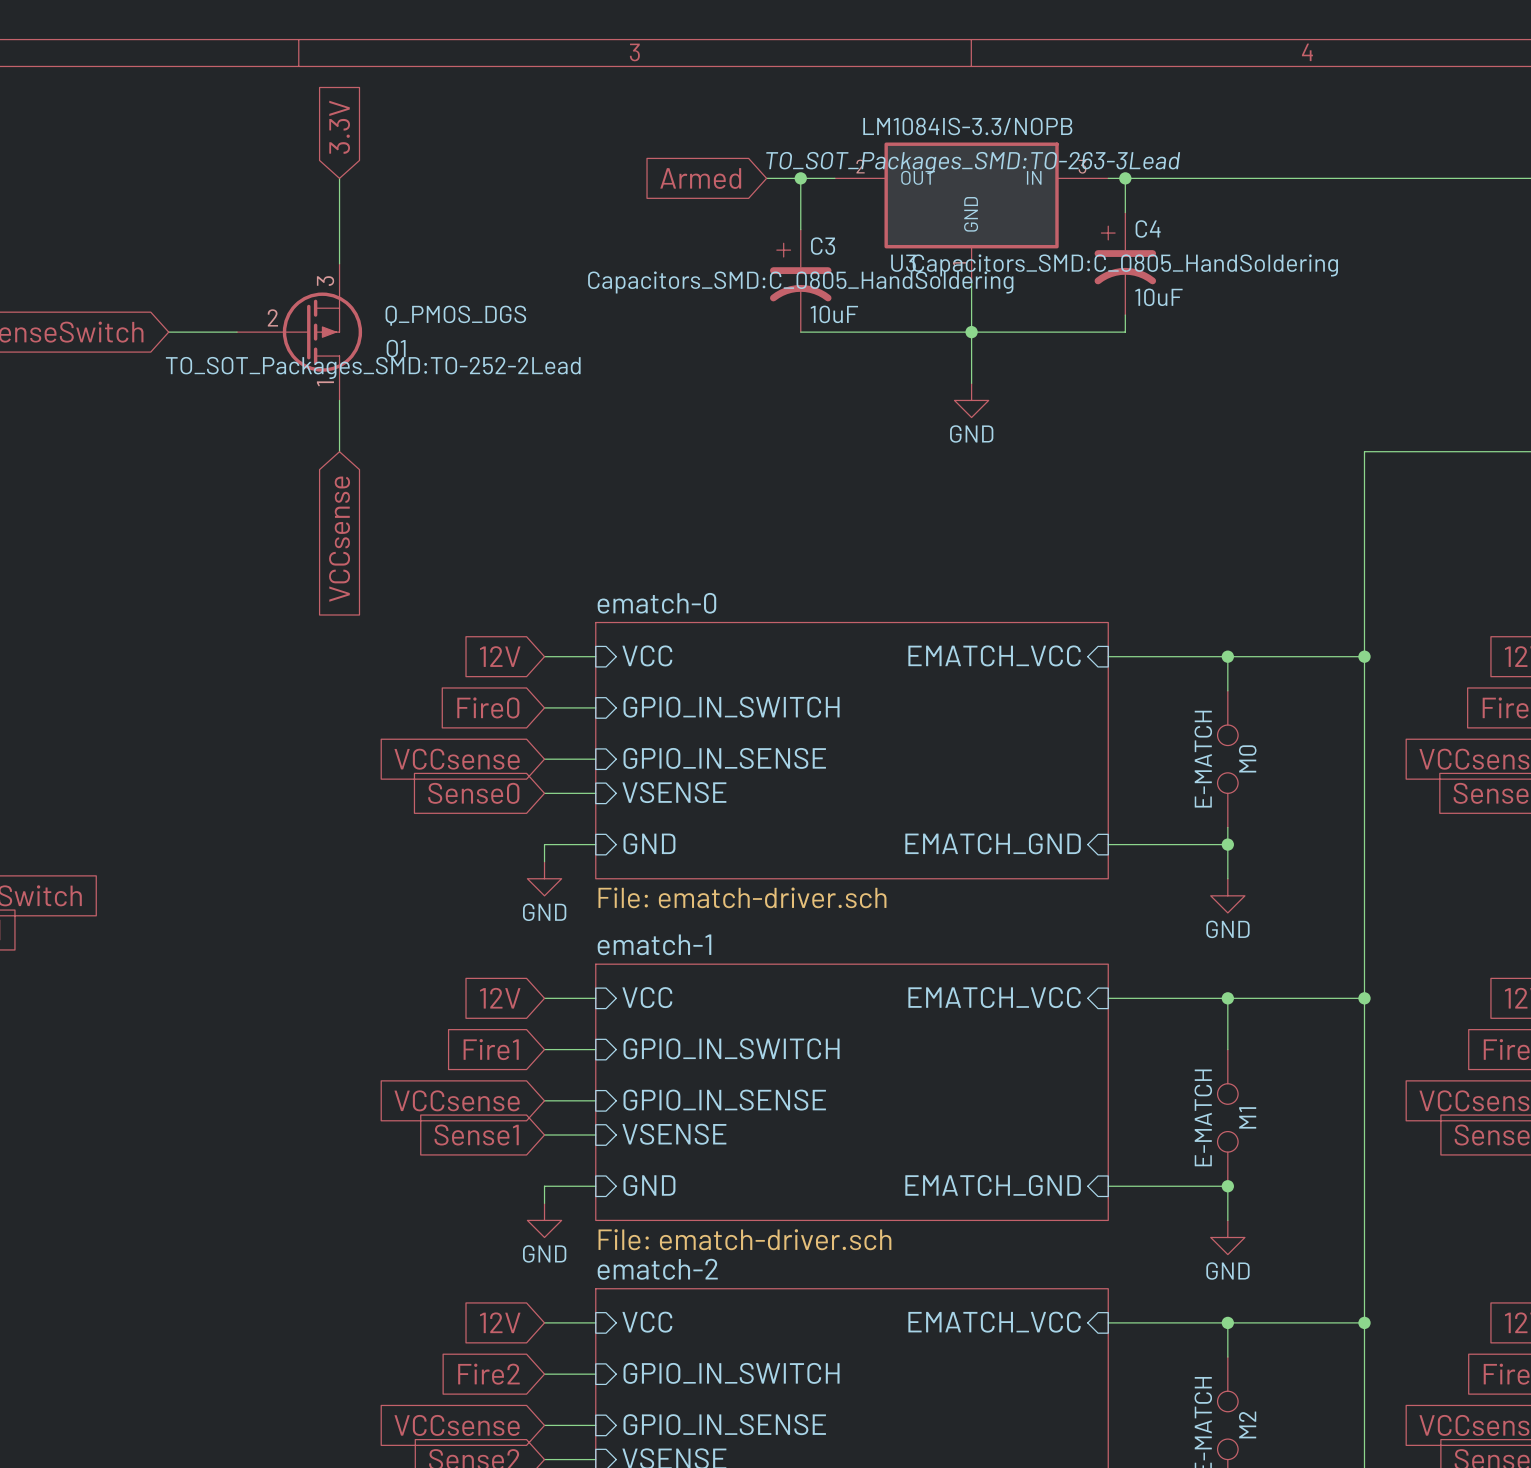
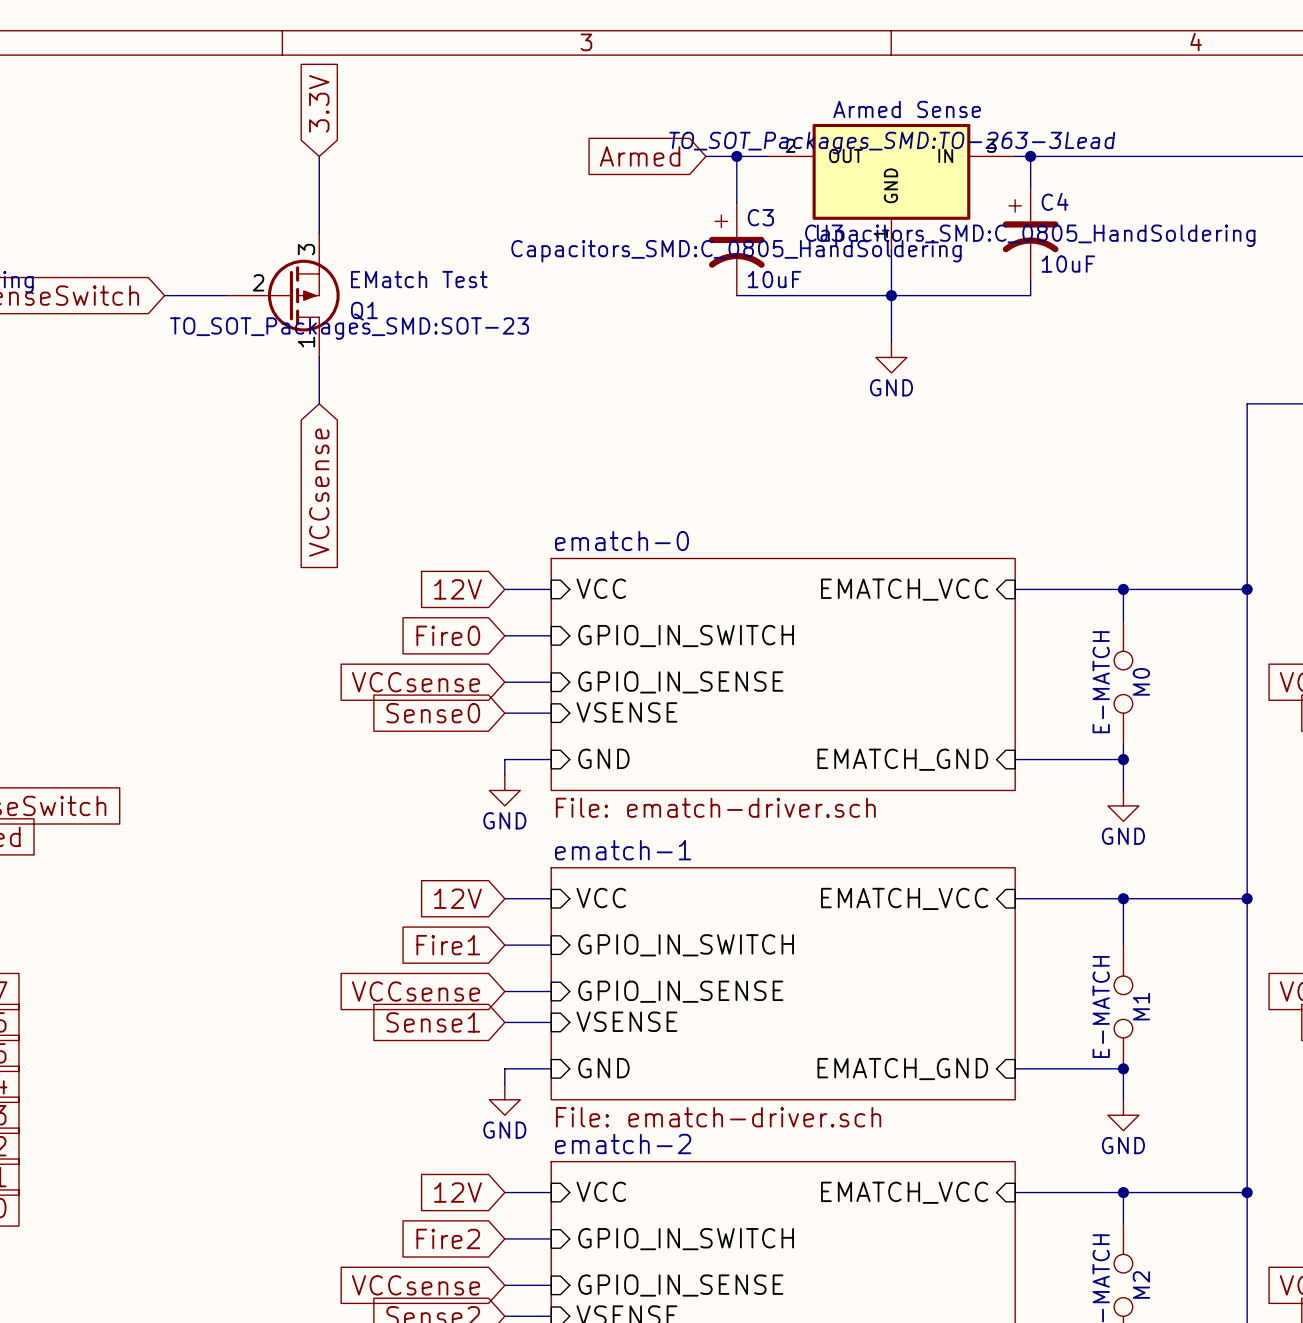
U3 value: LM1084IS-3.3/NOPB (967, 126) -> Armed Sense (907, 109)
Q1 value: Q_PMOS_DGS (455, 315) -> EMatch Test (419, 279)
Q1 text: TO_SOT_Packages_SMD:TO-252-2Lead (373, 367) -> TO_SOT_Packages_SMD:SOT-23 (349, 328)

